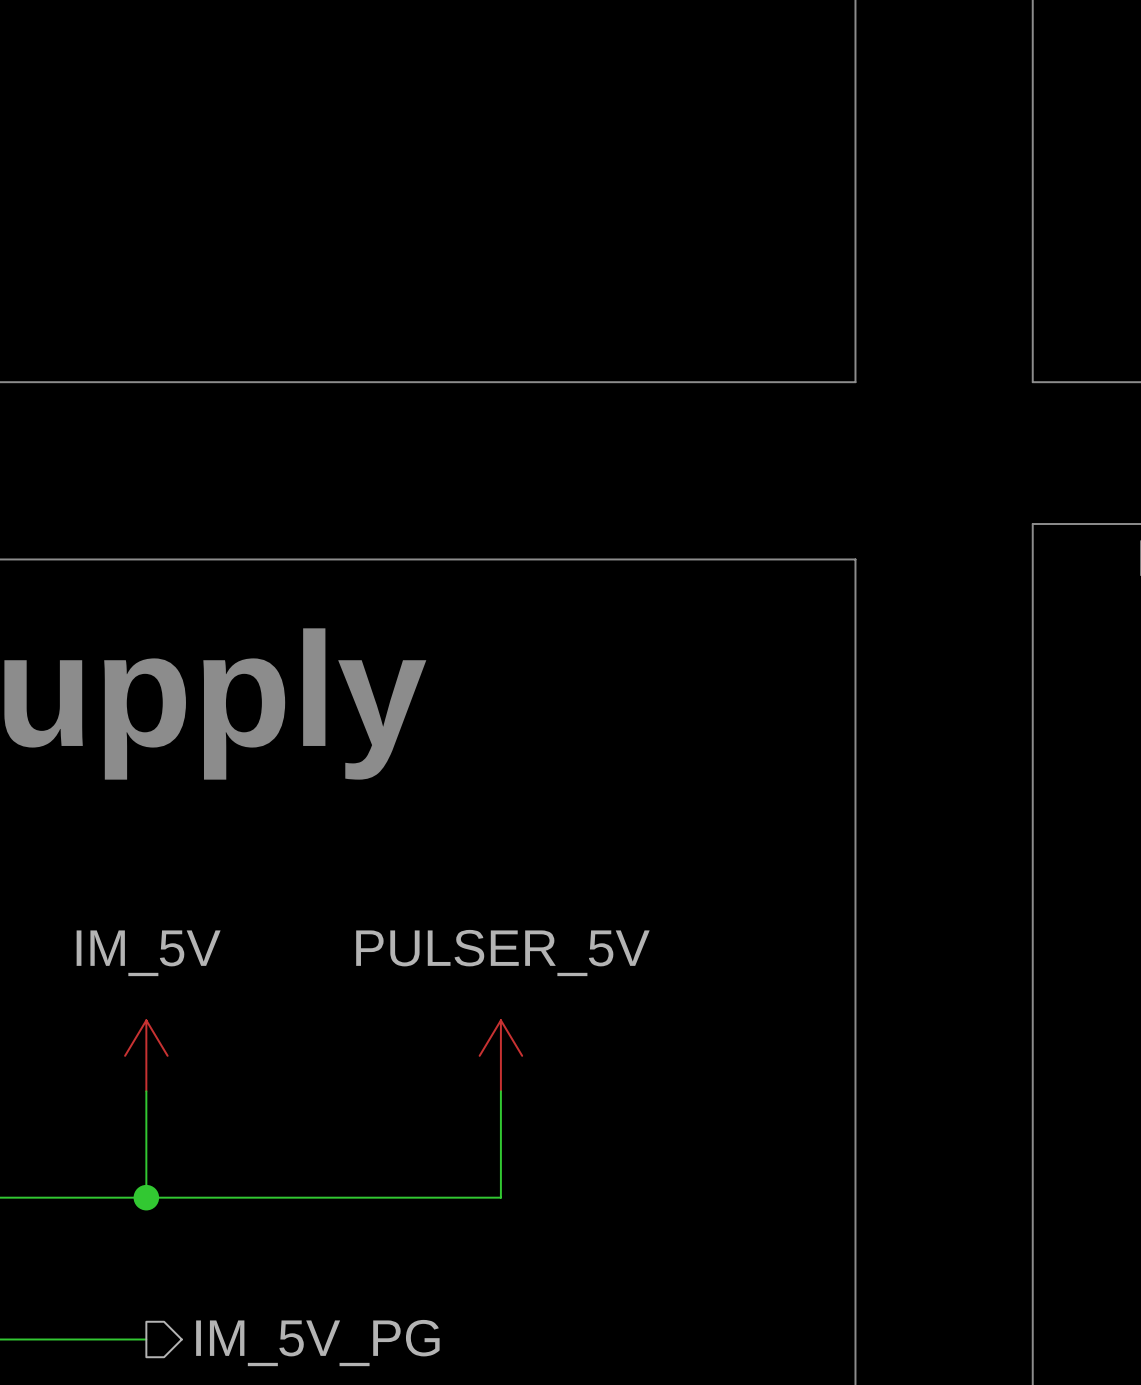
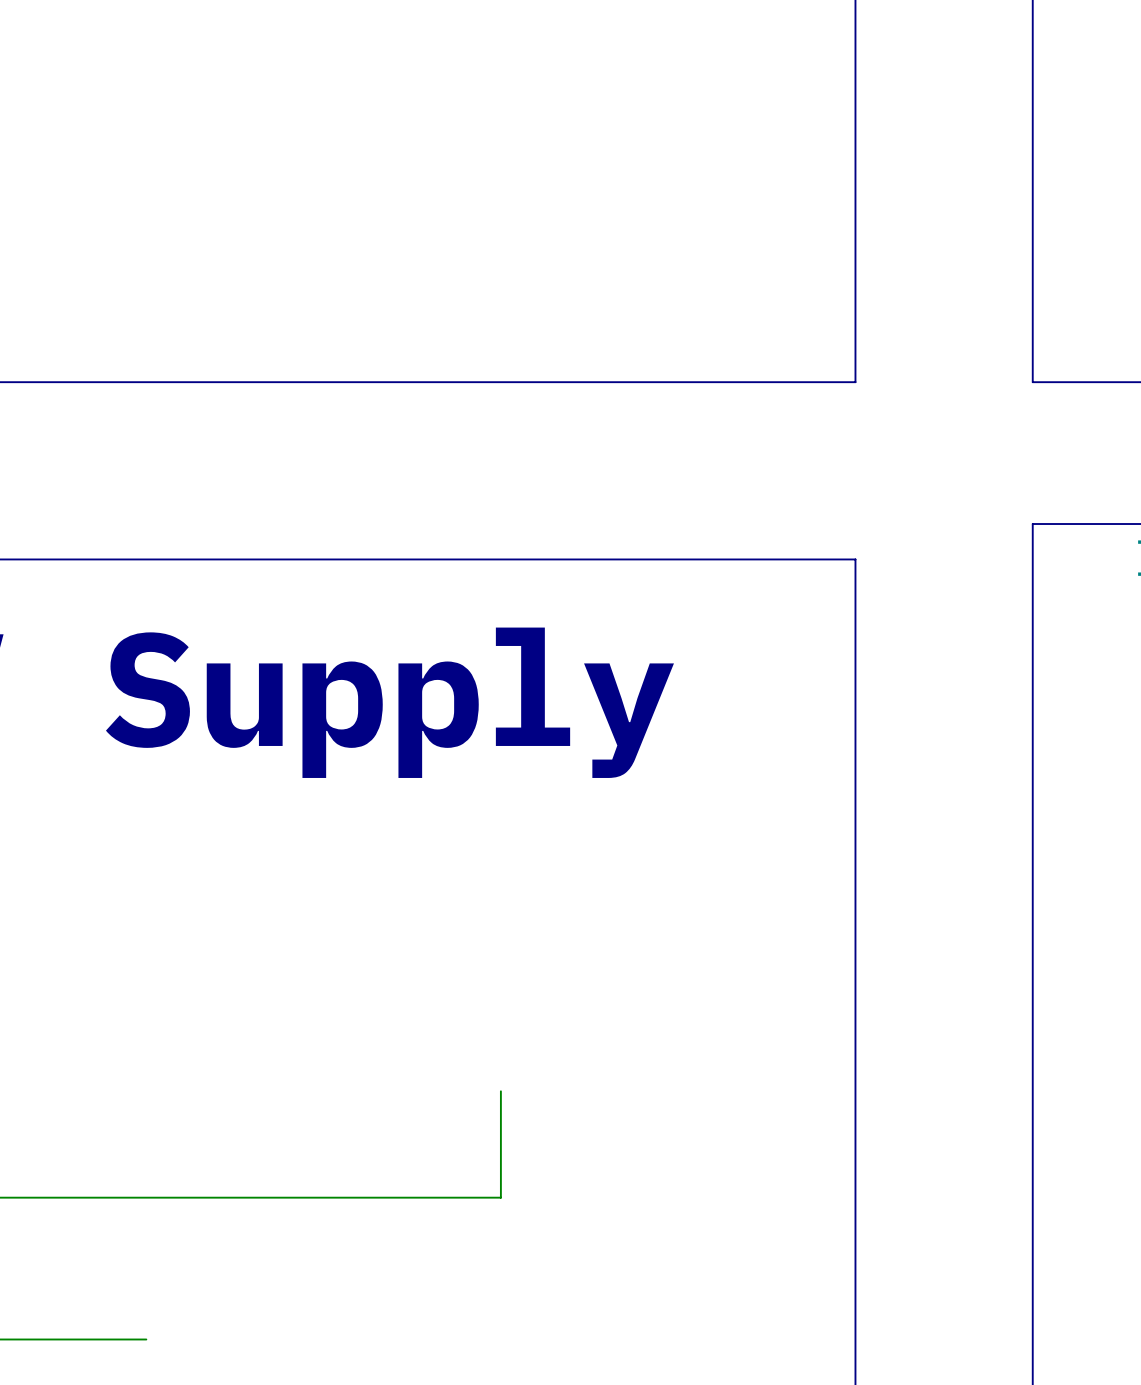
power symbol: IM_5V (146, 1055) -> none
power symbol: PULSER_5V (500, 1055) -> none
wire: (146, 1091) (146, 1197) -> none
junction: (146, 1197) -> none
hierarchical label: IM_5V_PG (317, 1343) -> none

